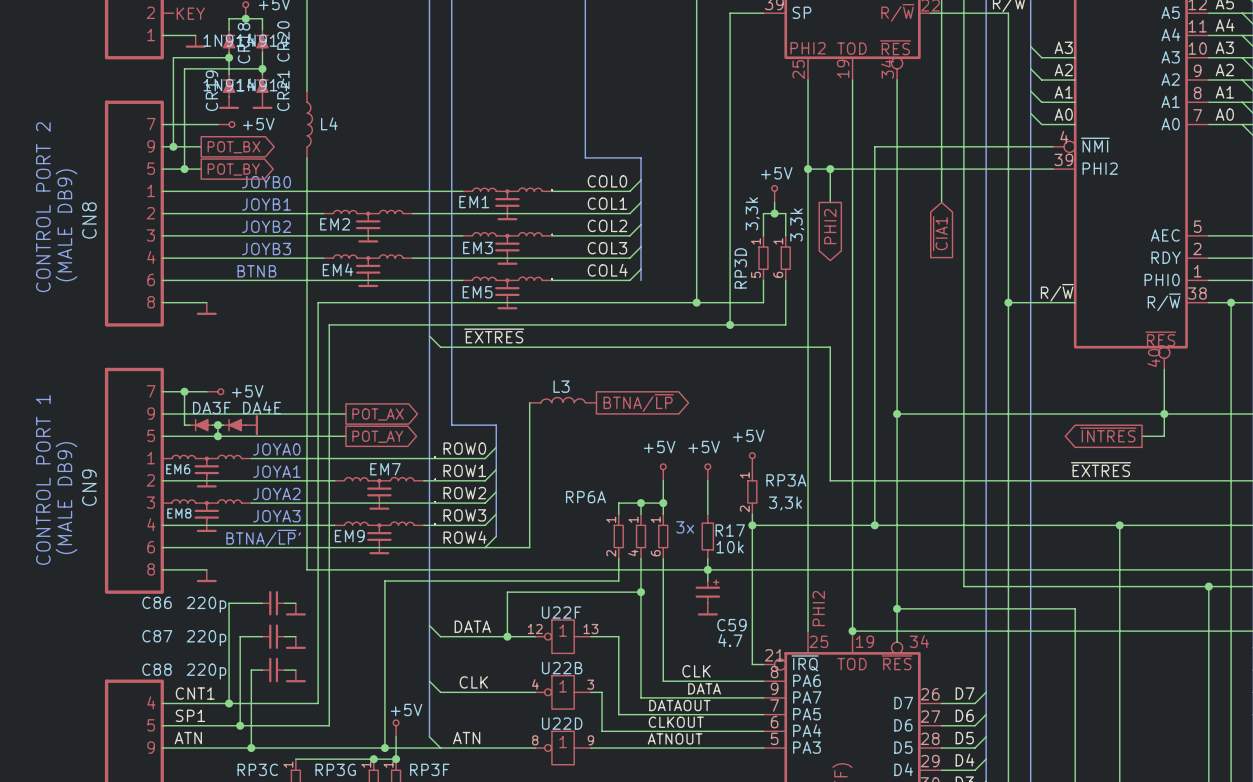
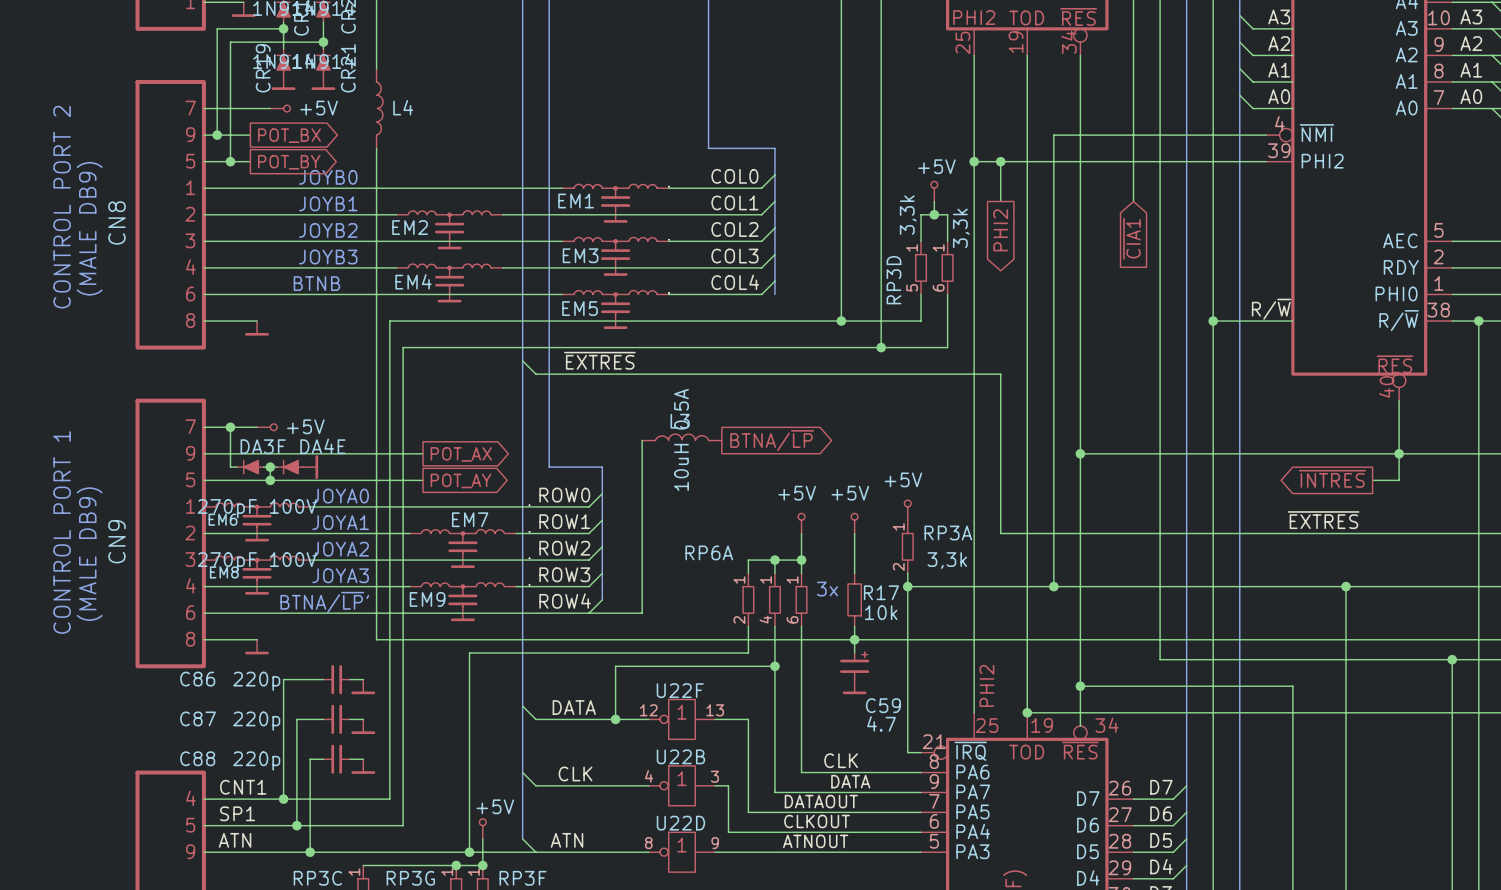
L3 value: none -> 10uH 0.5A (681, 439)
EM6 value: none -> 270pF 100V (257, 508)
EM8 value: none -> 270pF 100V (257, 561)

